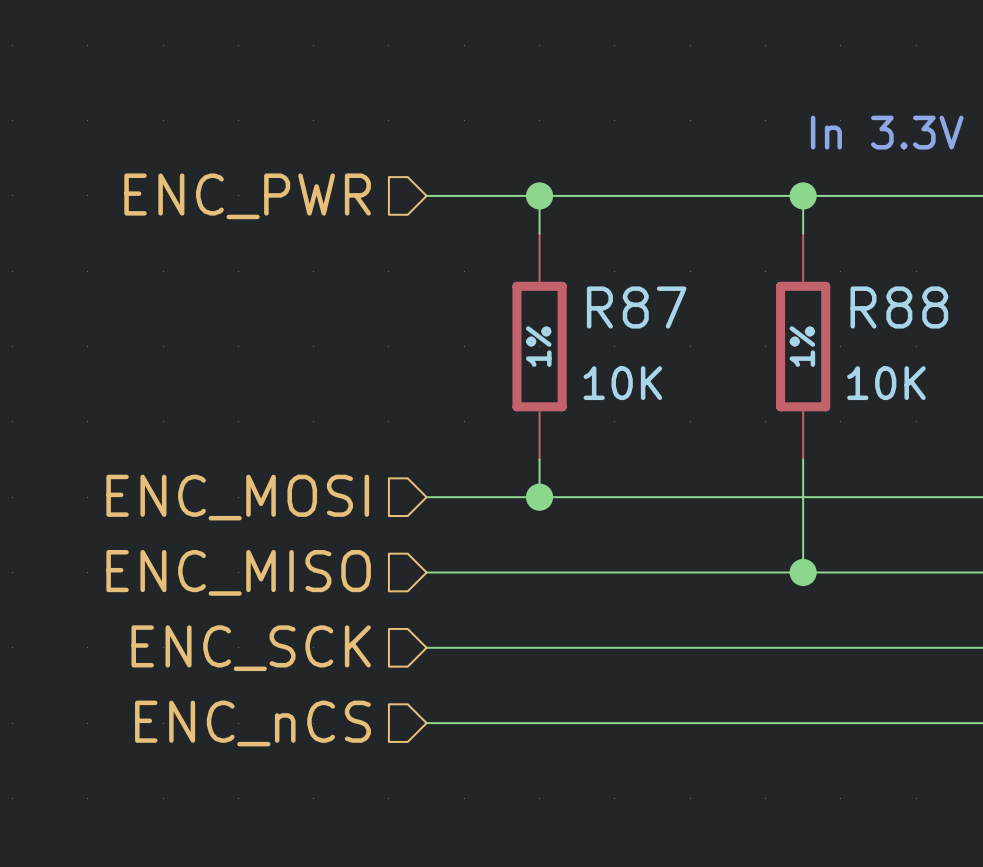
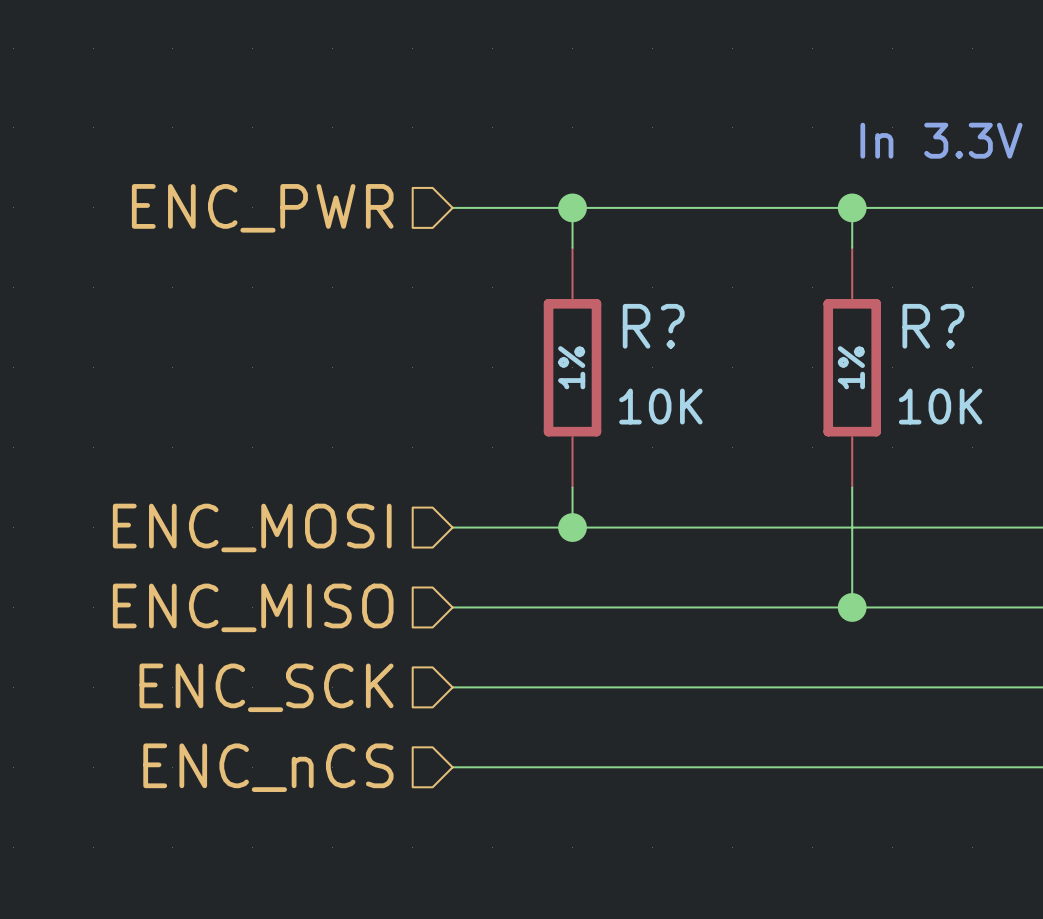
R87 name: R87 (636, 307) -> R? (653, 326)
R88 name: R88 (899, 307) -> R? (933, 326)

